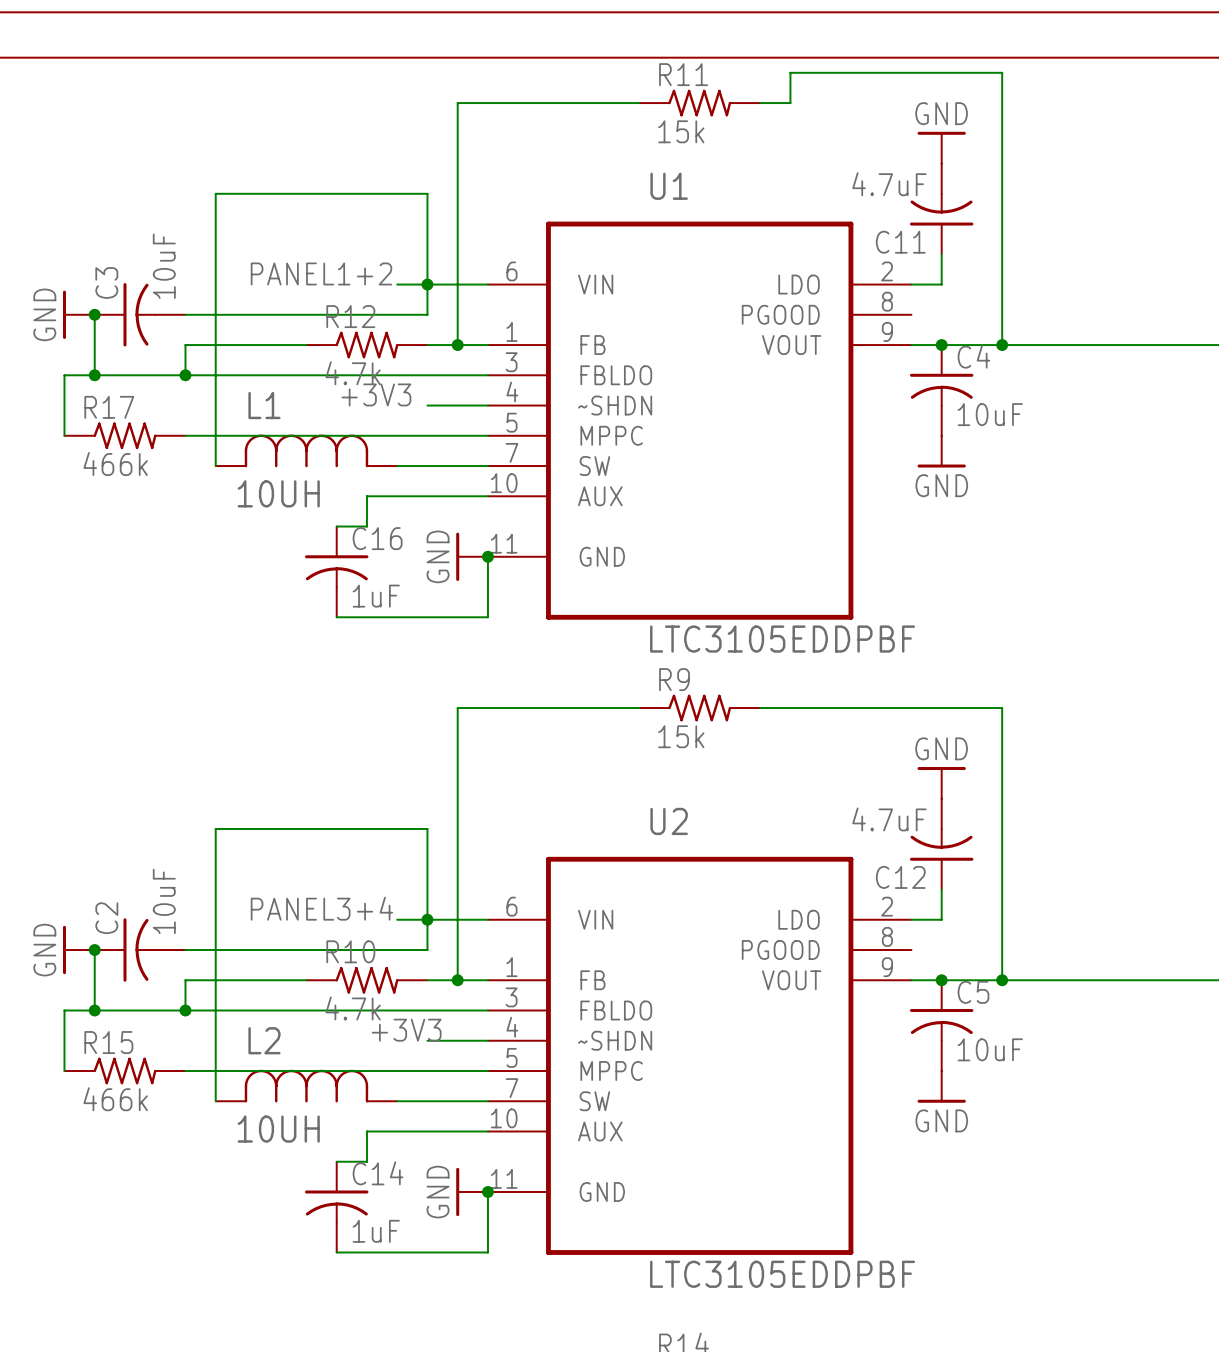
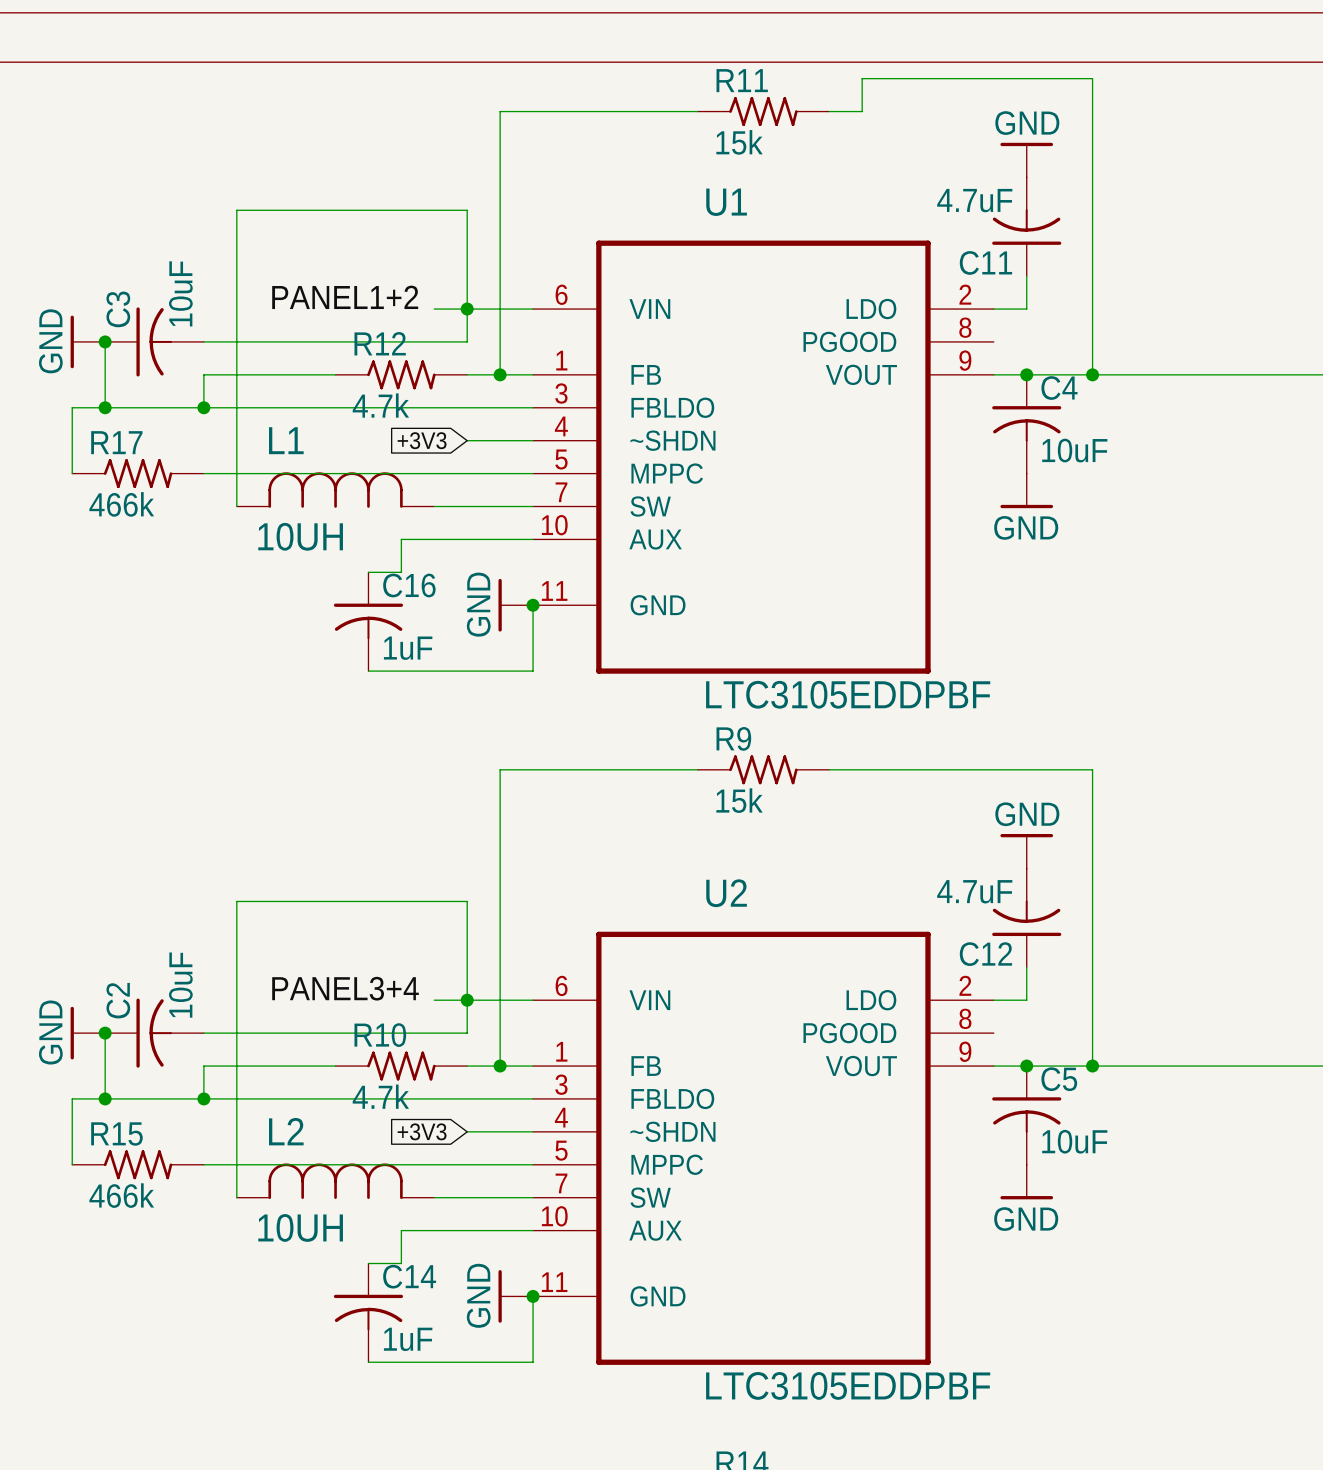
label: +3V3 (376, 394) -> none
global label: none -> +3V3 (422, 440)
label: +3V3 (406, 1030) -> none
global label: none -> +3V3 (422, 1131)

